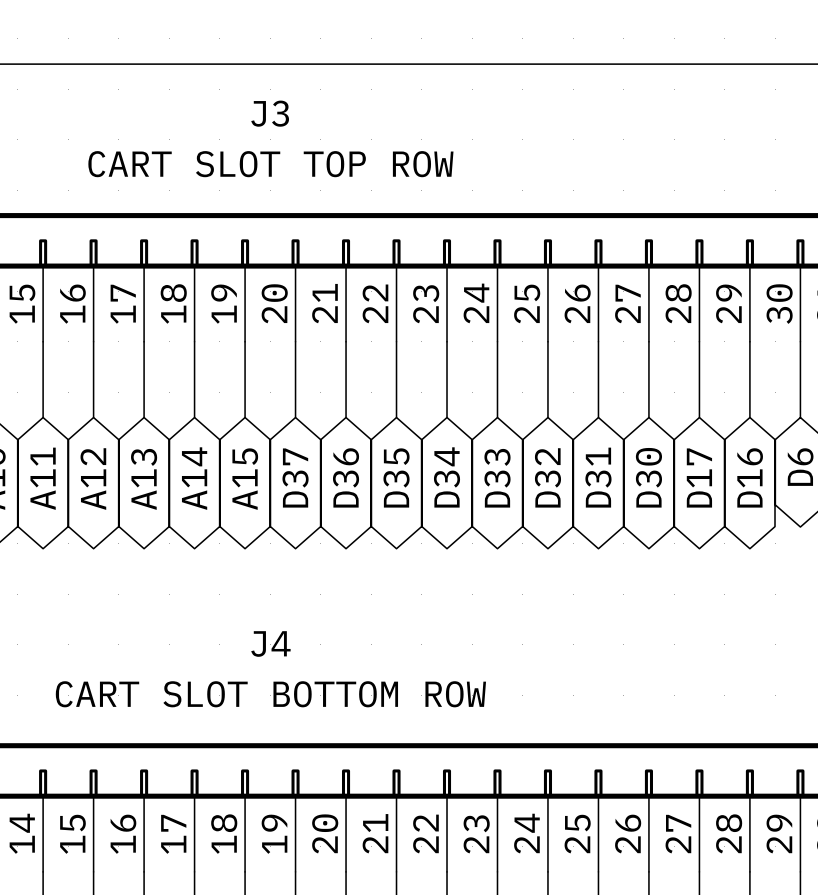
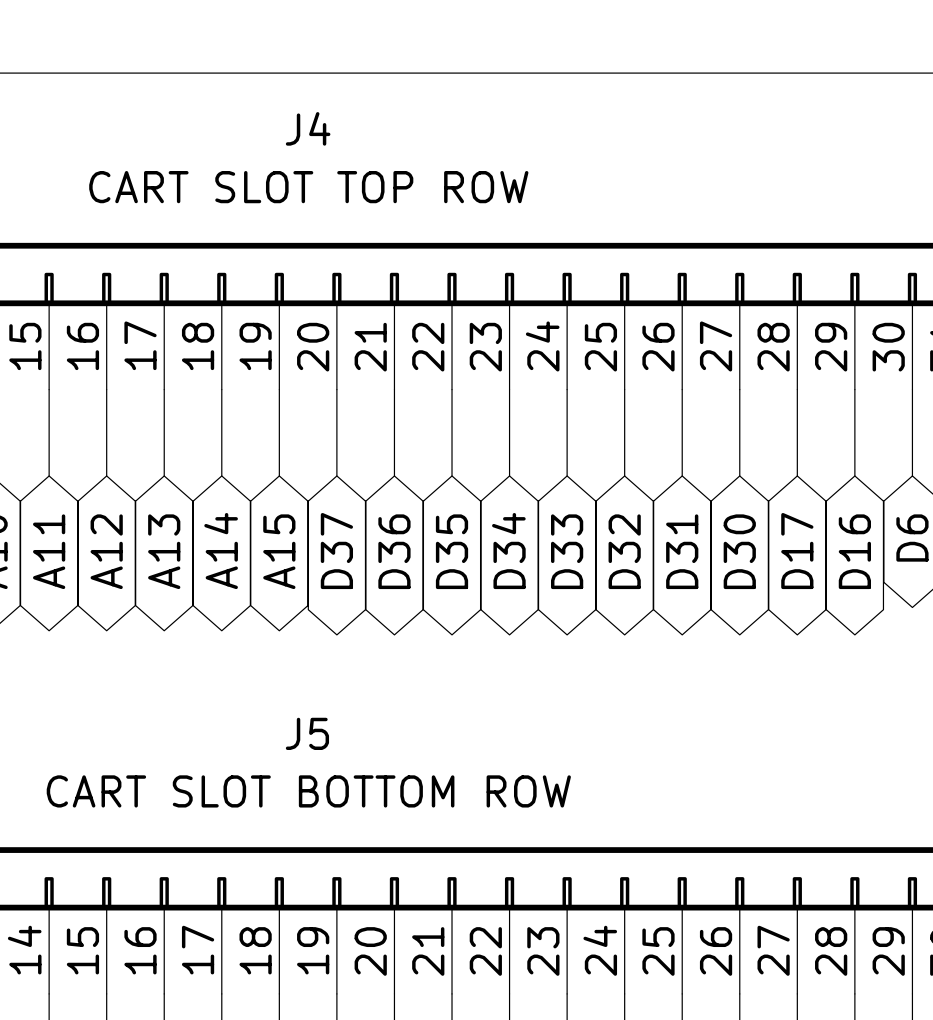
J3 name: J3 (270, 113) -> J4 (308, 128)
J4 name: J4 (270, 644) -> J5 (307, 733)

